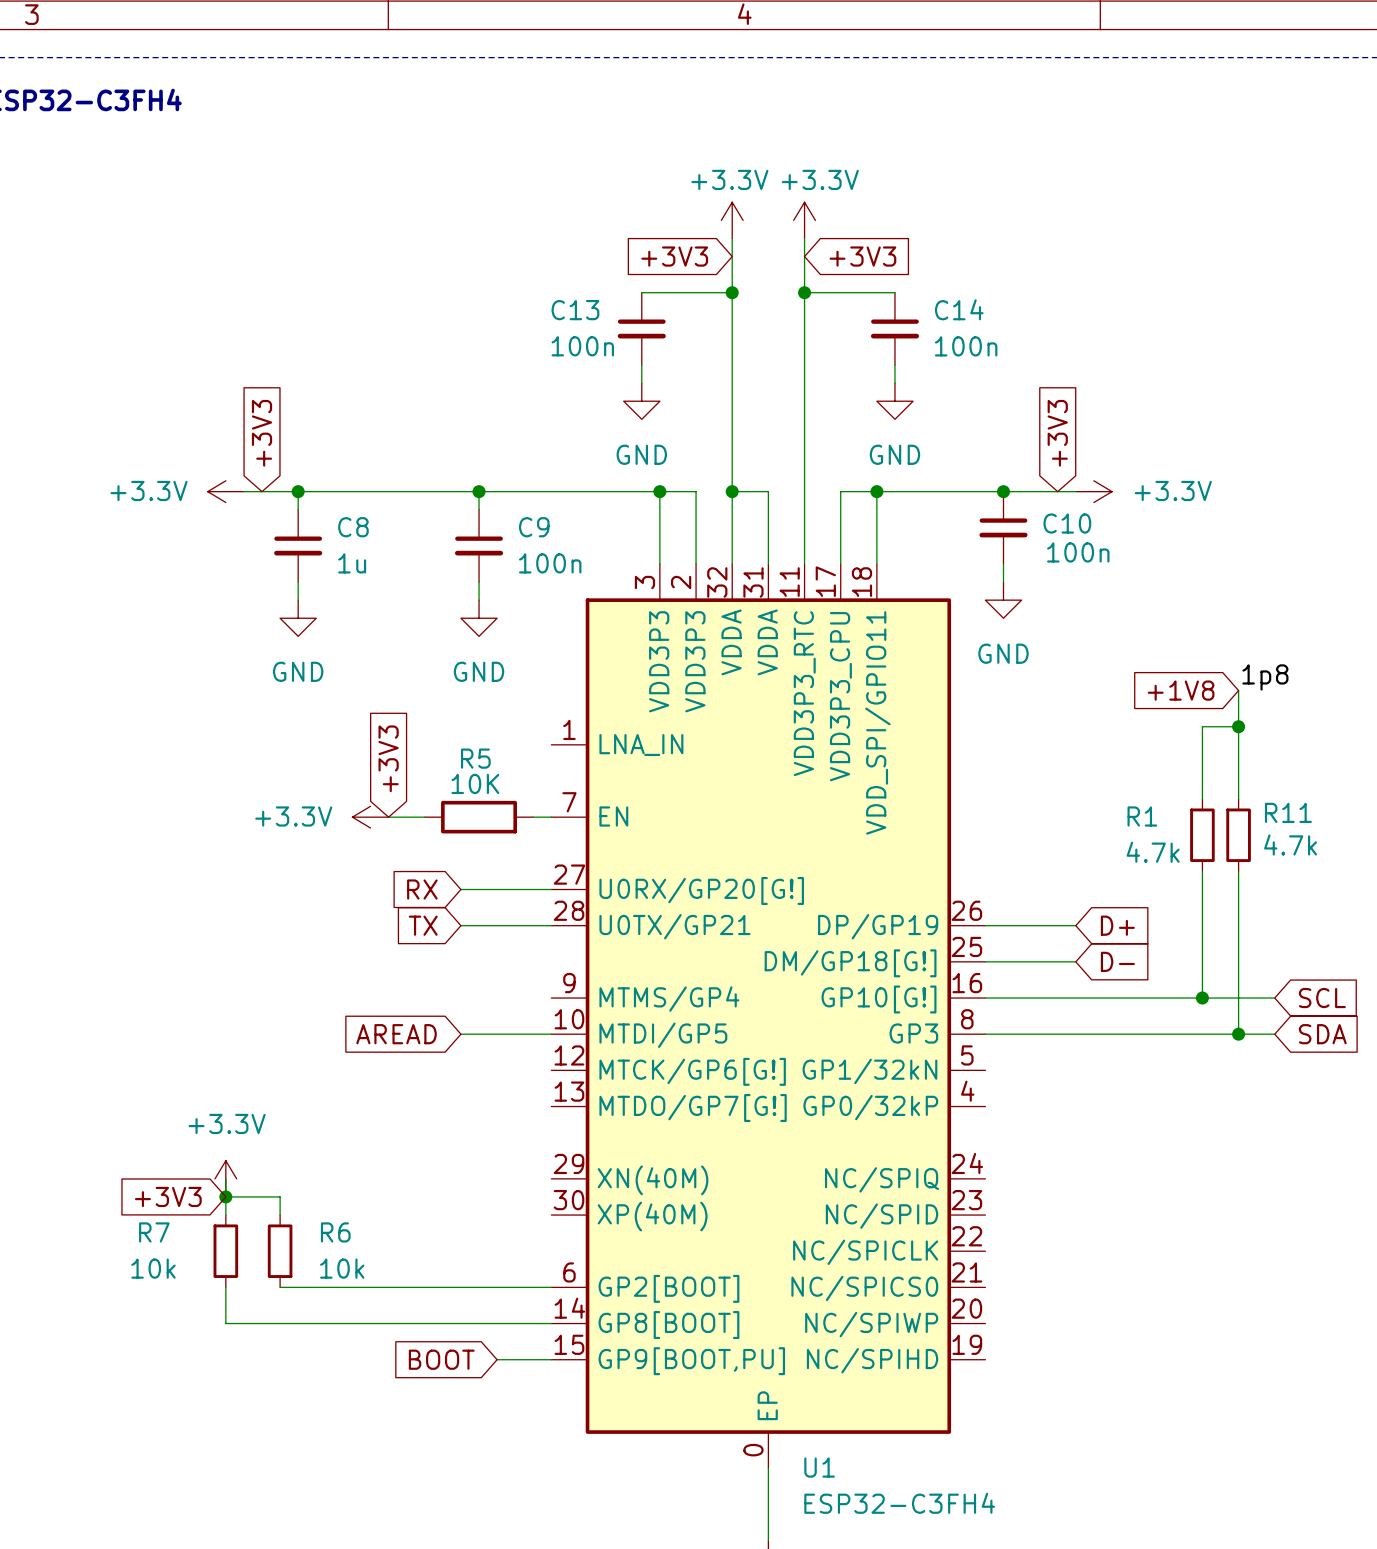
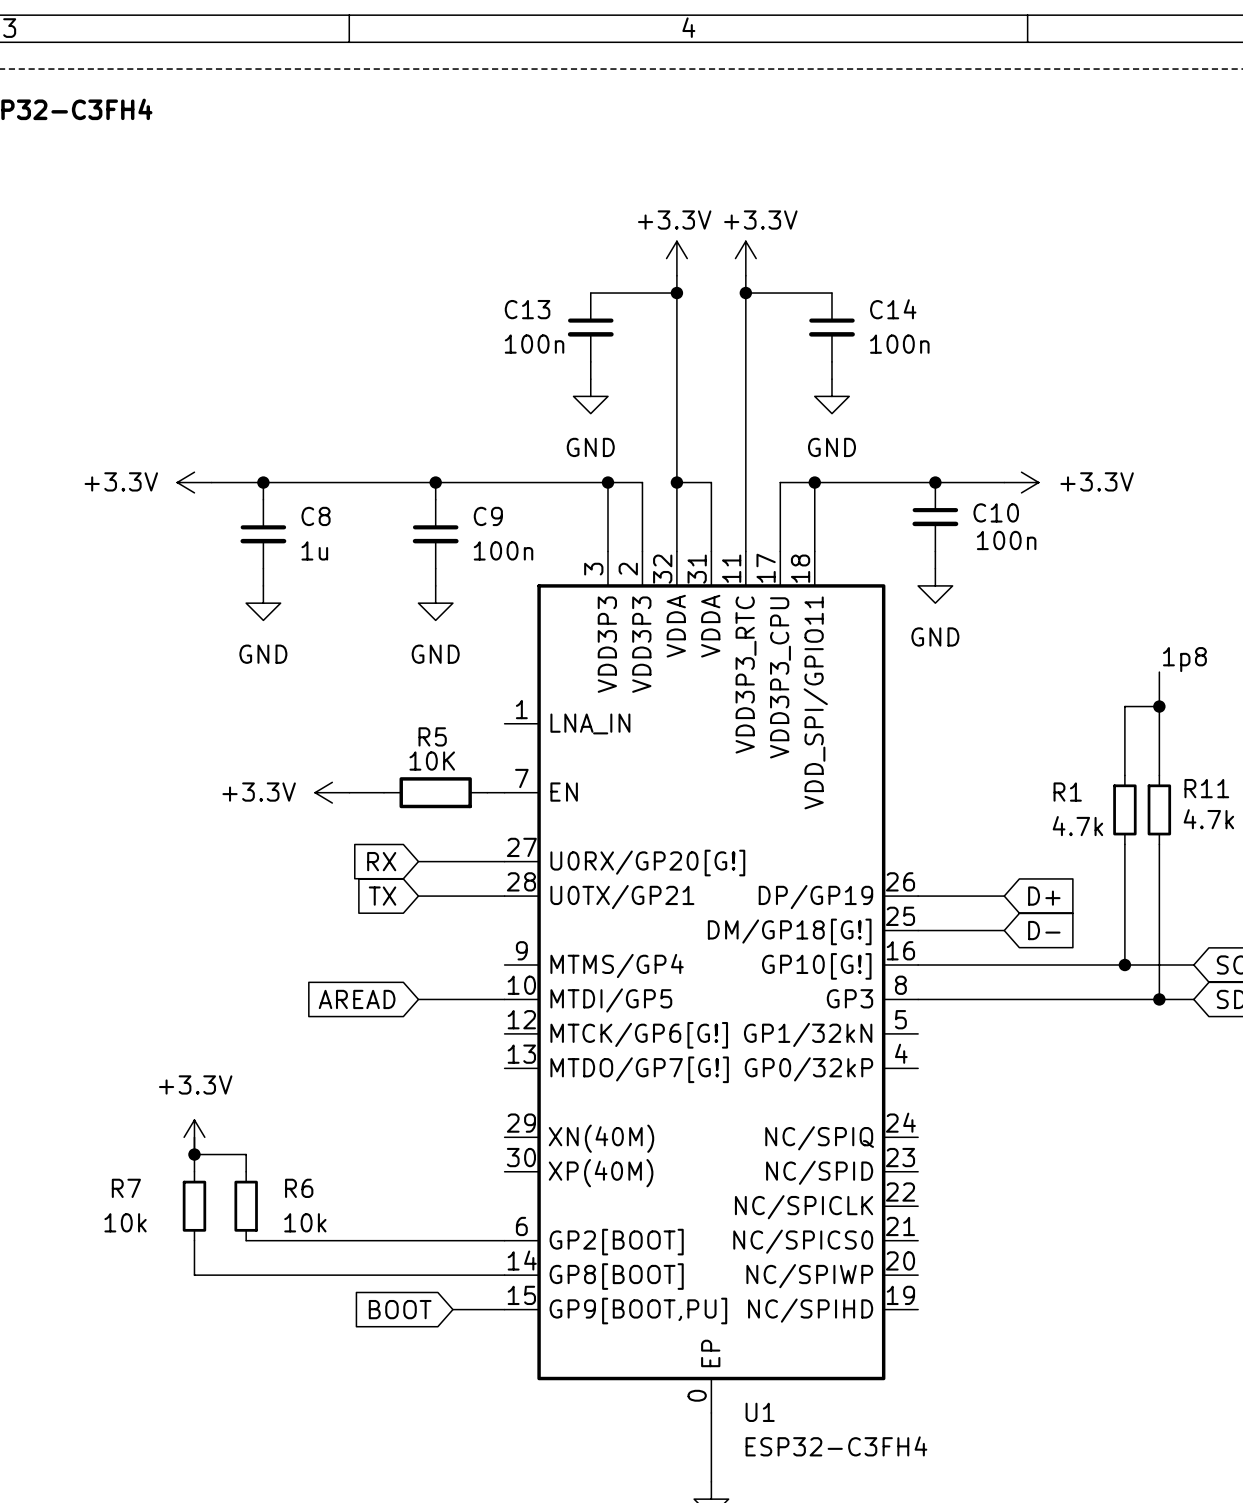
power symbol position: +3.3V (732, 220) -> +3.3V (676, 258)
power symbol position: +3.3V (804, 220) -> +3.3V (745, 258)
global label: +3V3 (674, 256) -> none
global label: +3V3 (862, 256) -> none
global label: +3V3 (262, 433) -> none
global label: +3V3 (1057, 433) -> none
global label: +1V8 (1181, 690) -> none
global label: +3V3 (388, 758) -> none
global label: +3V3 (168, 1196) -> none

